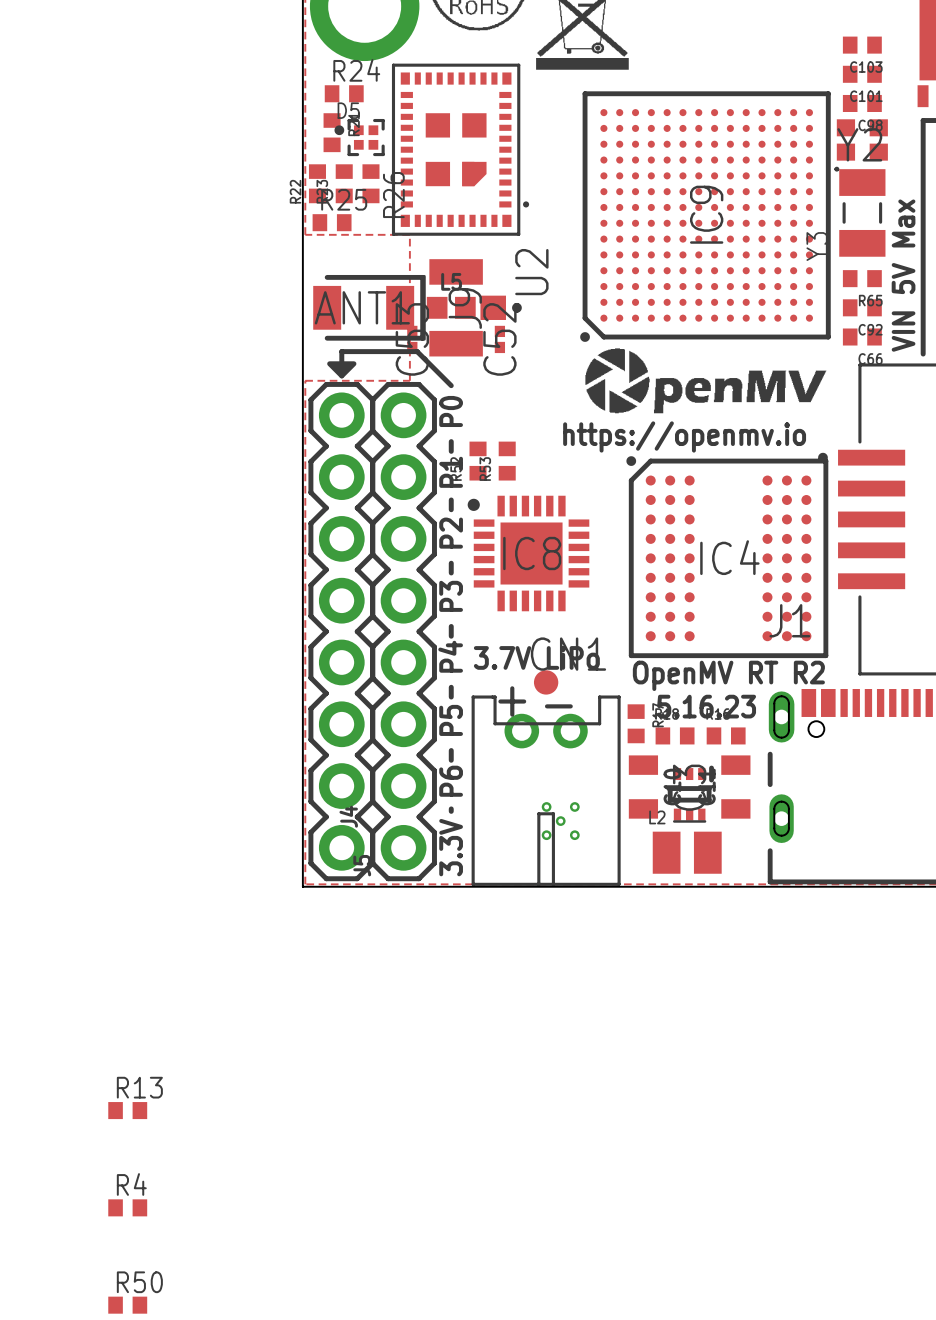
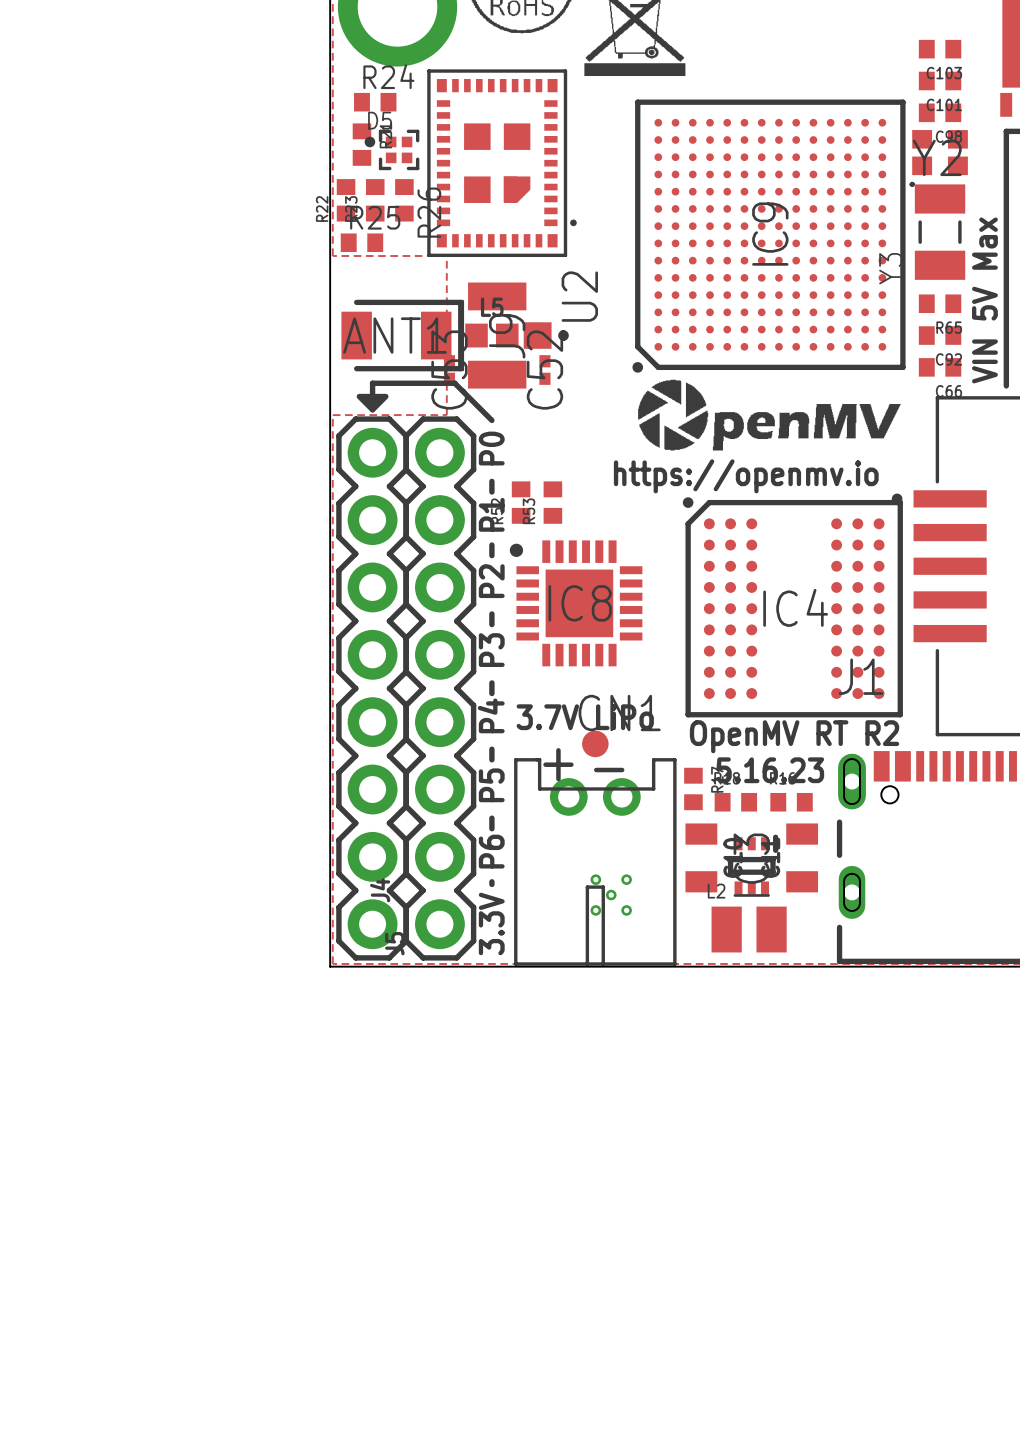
R13: (127, 1110) -> none
R4: (127, 1207) -> none
R50: (127, 1305) -> none

